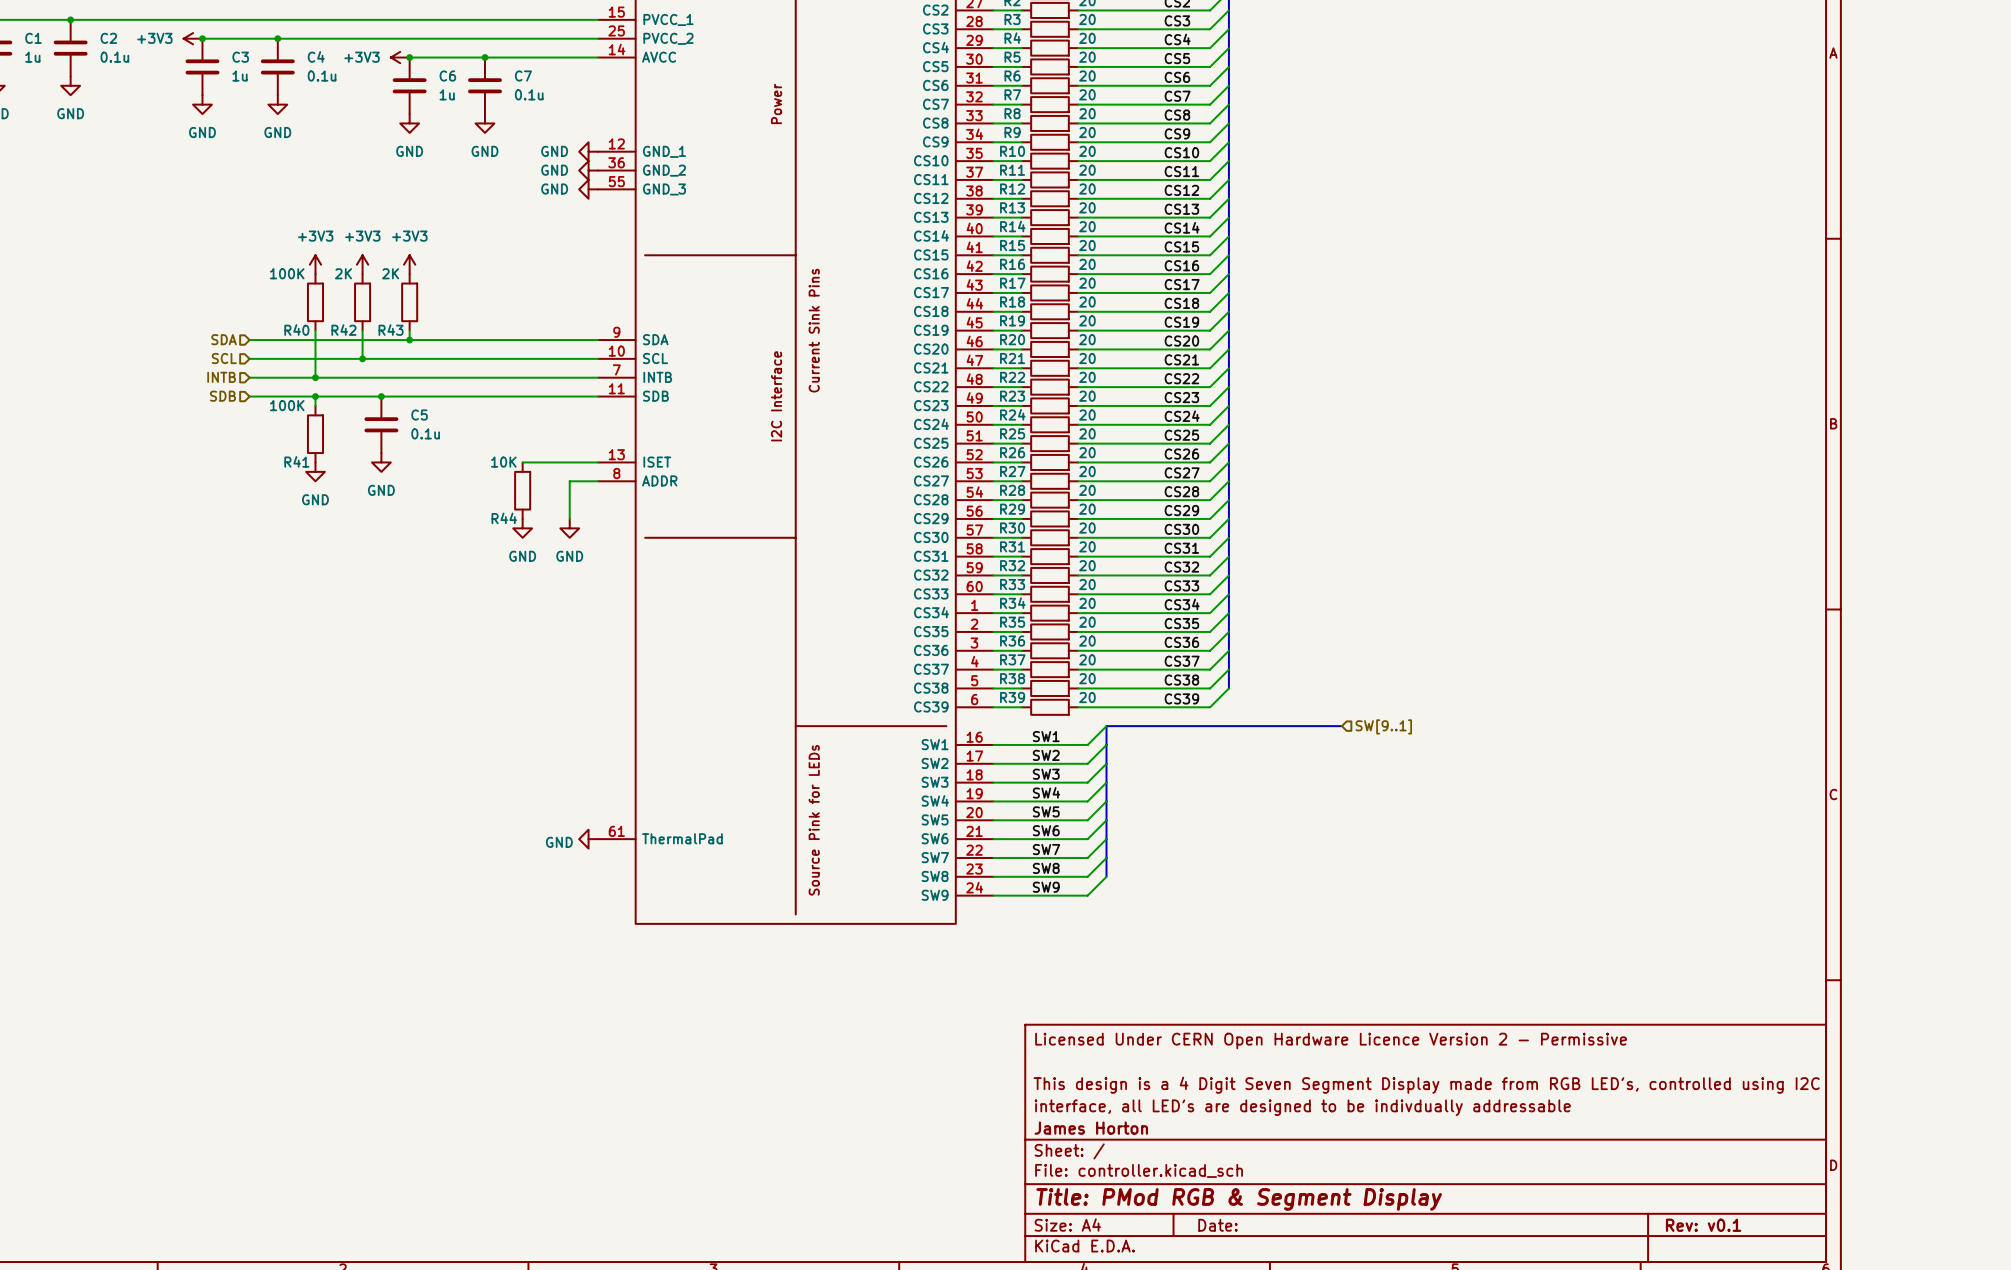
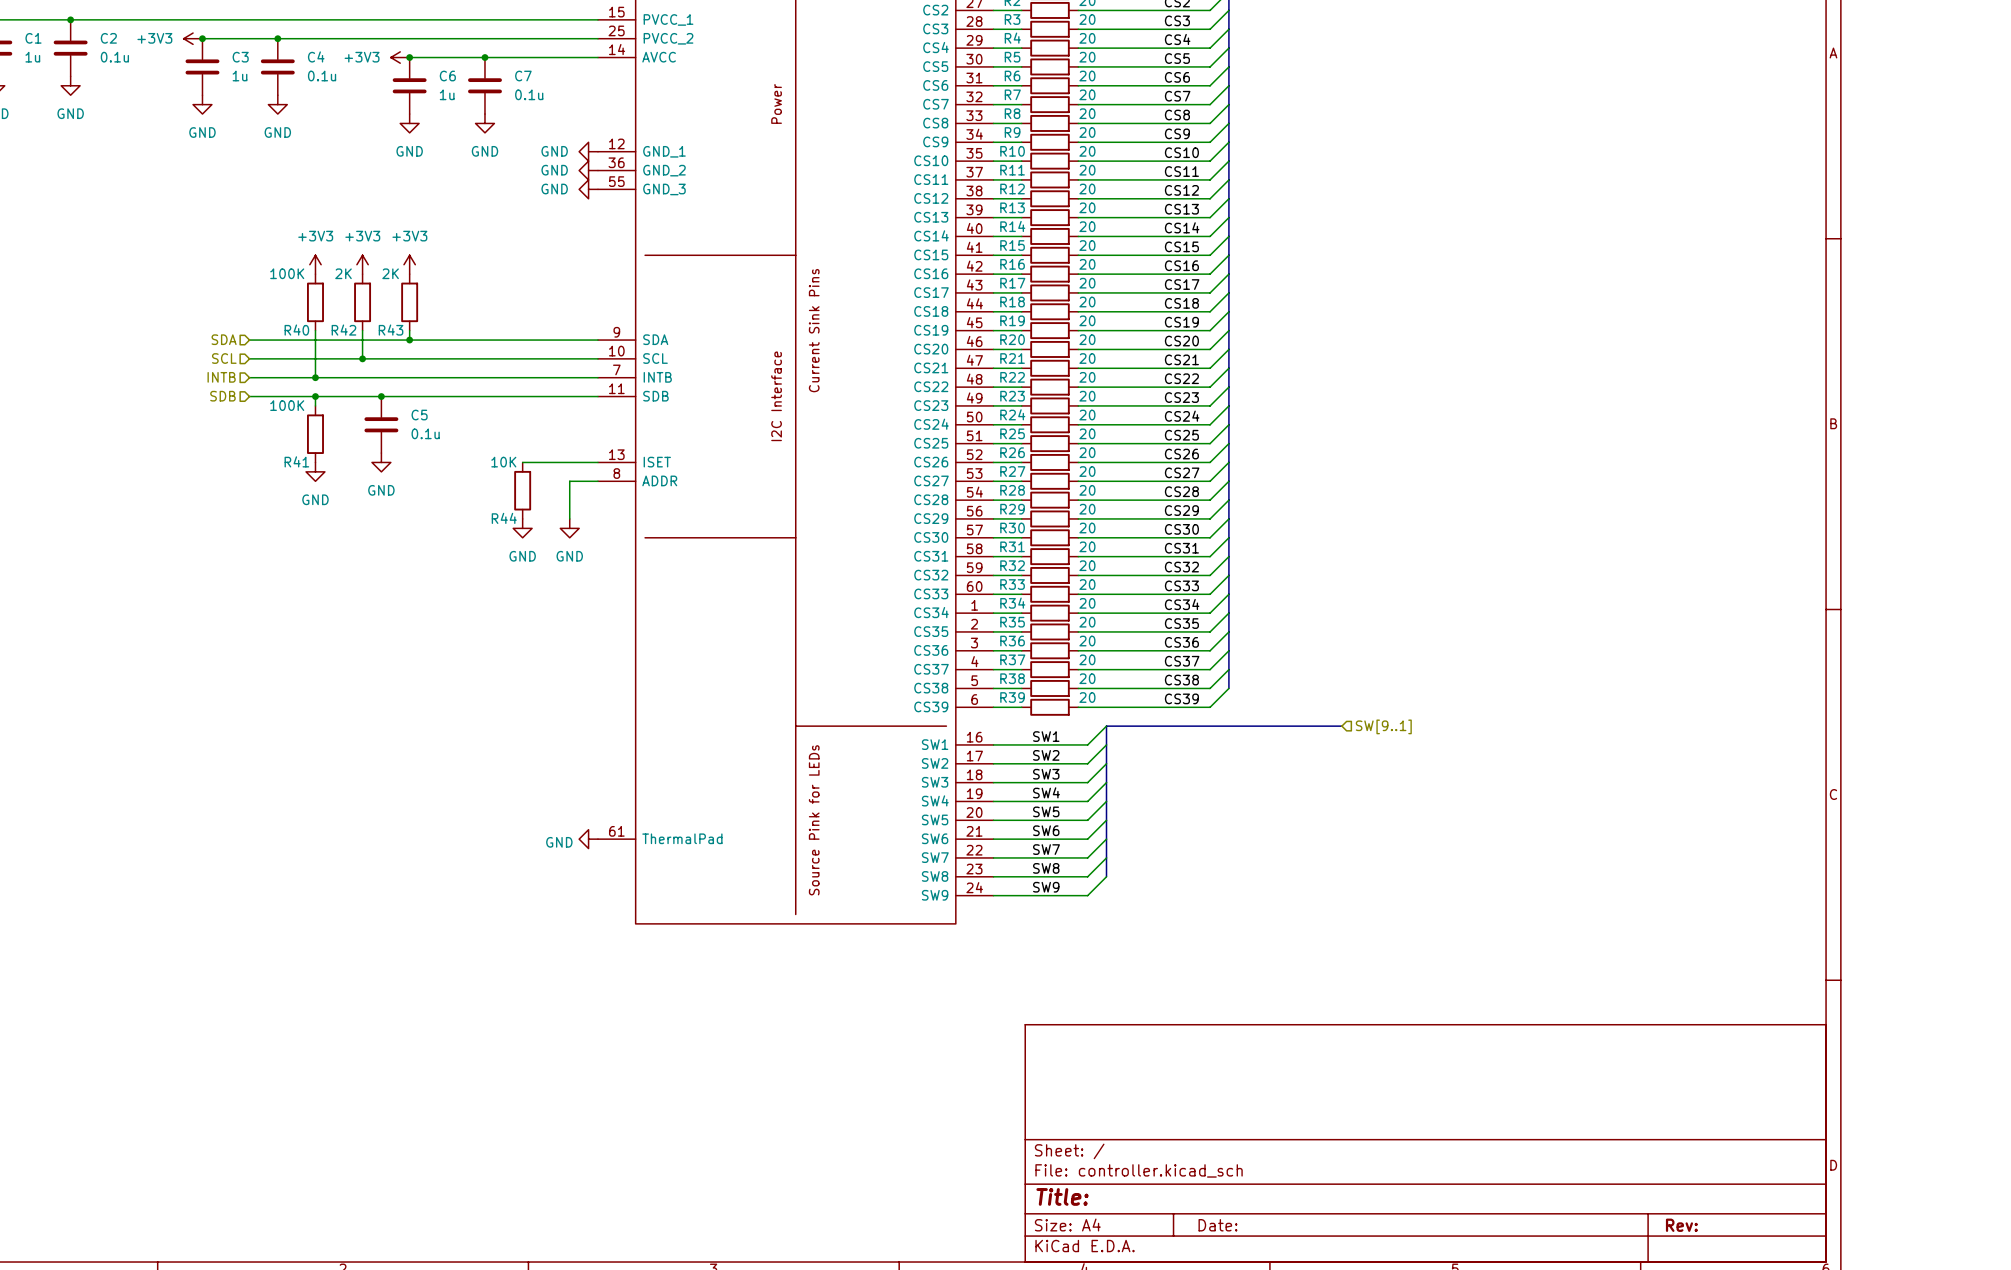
title block: Licensed Under CERN Open Hardware Licence Version 2 - Permissive (1331, 1041) -> none
title block: This design is a 4 Digit Seven Segment Display made from RGB LED's, controlled using I2C (1426, 1085) -> none
title block: interface, all LED's are designed to be indivdually addressable (1302, 1107) -> none
title block: James Horton (1091, 1128) -> none
title block: Title: PMod RGB & Segment Display (1239, 1199) -> Title: (1062, 1196)
title block: Rev: v0.1 (1703, 1225) -> Rev: (1681, 1225)

